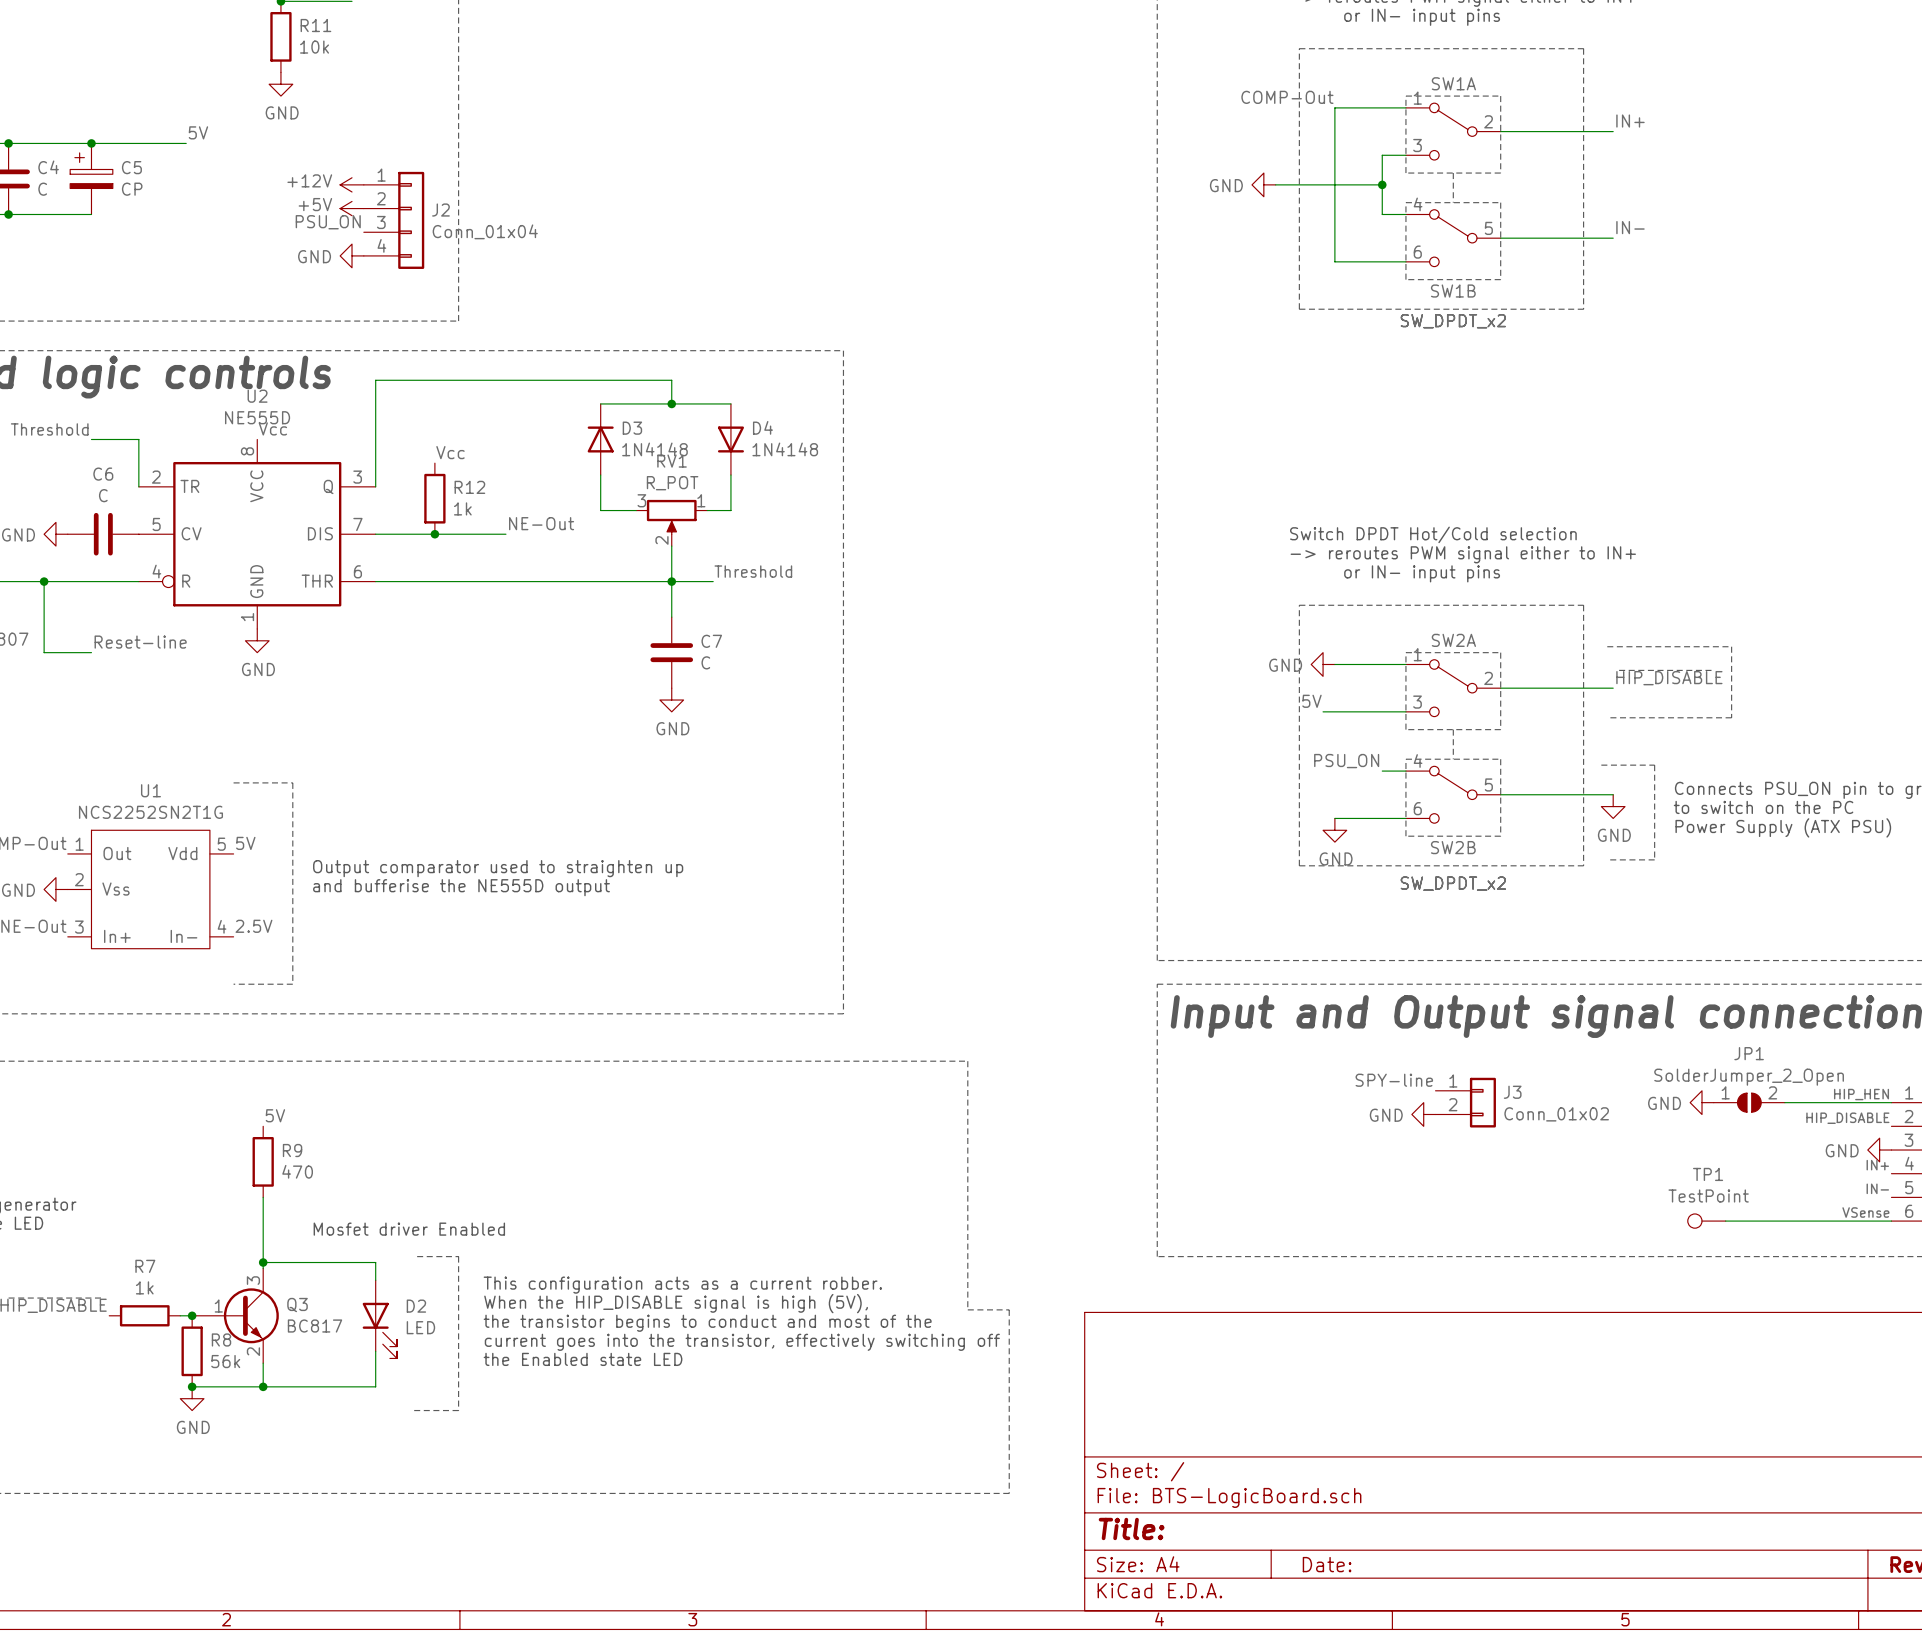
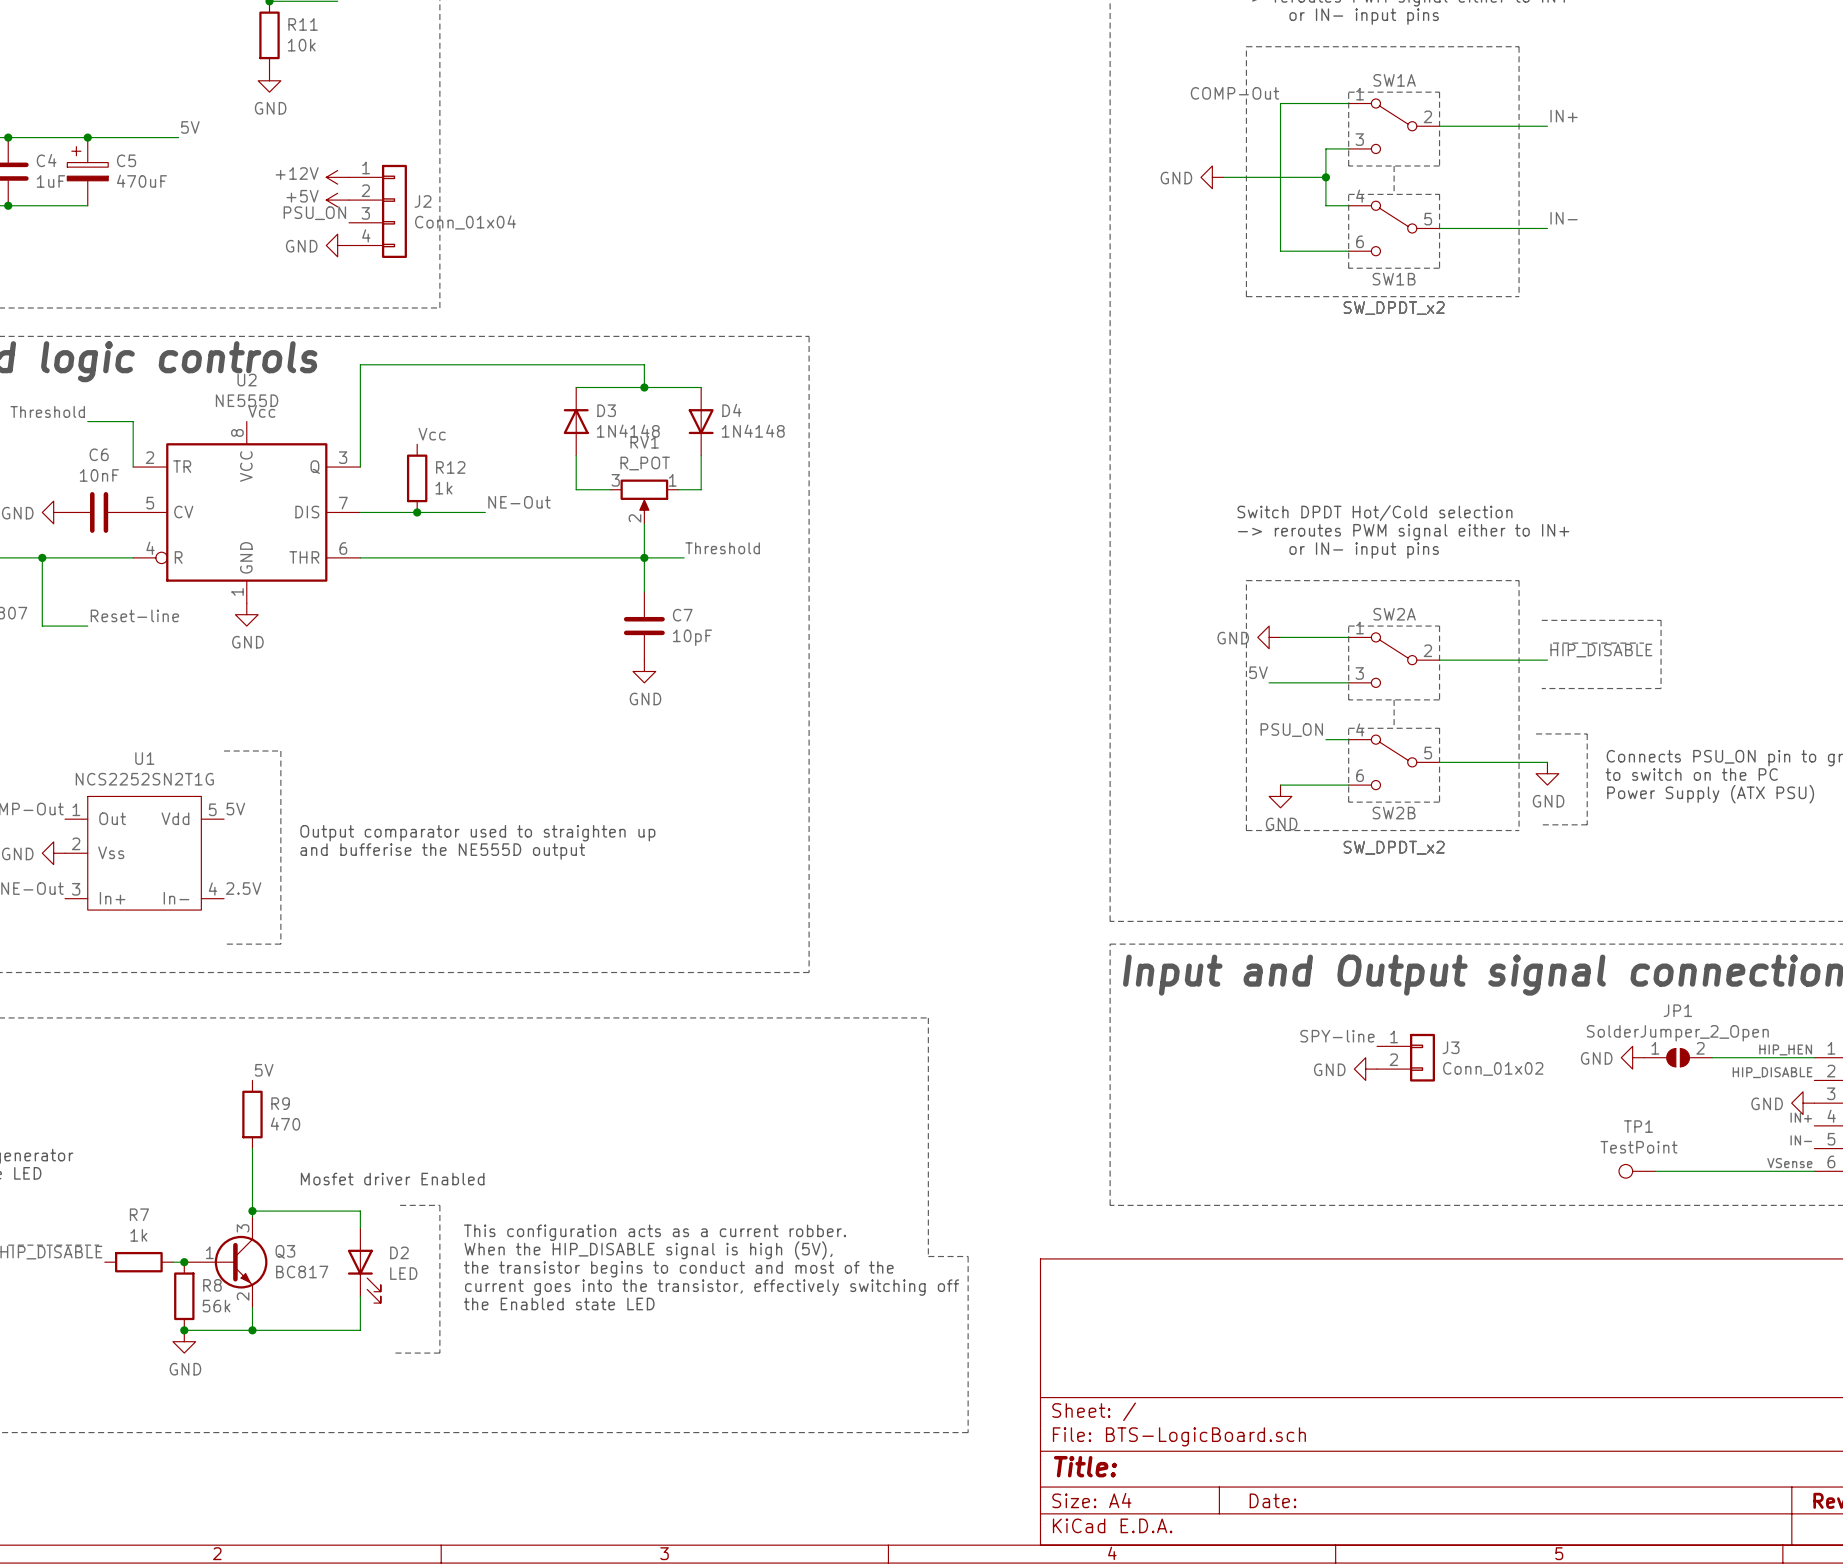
C4 value: C (42, 189) -> 1uF (50, 181)
C5 value: CP (132, 189) -> 470uF (141, 181)
C6 value: C (103, 495) -> 10nF (99, 475)
C7 value: C (705, 662) -> 10pF (692, 637)

